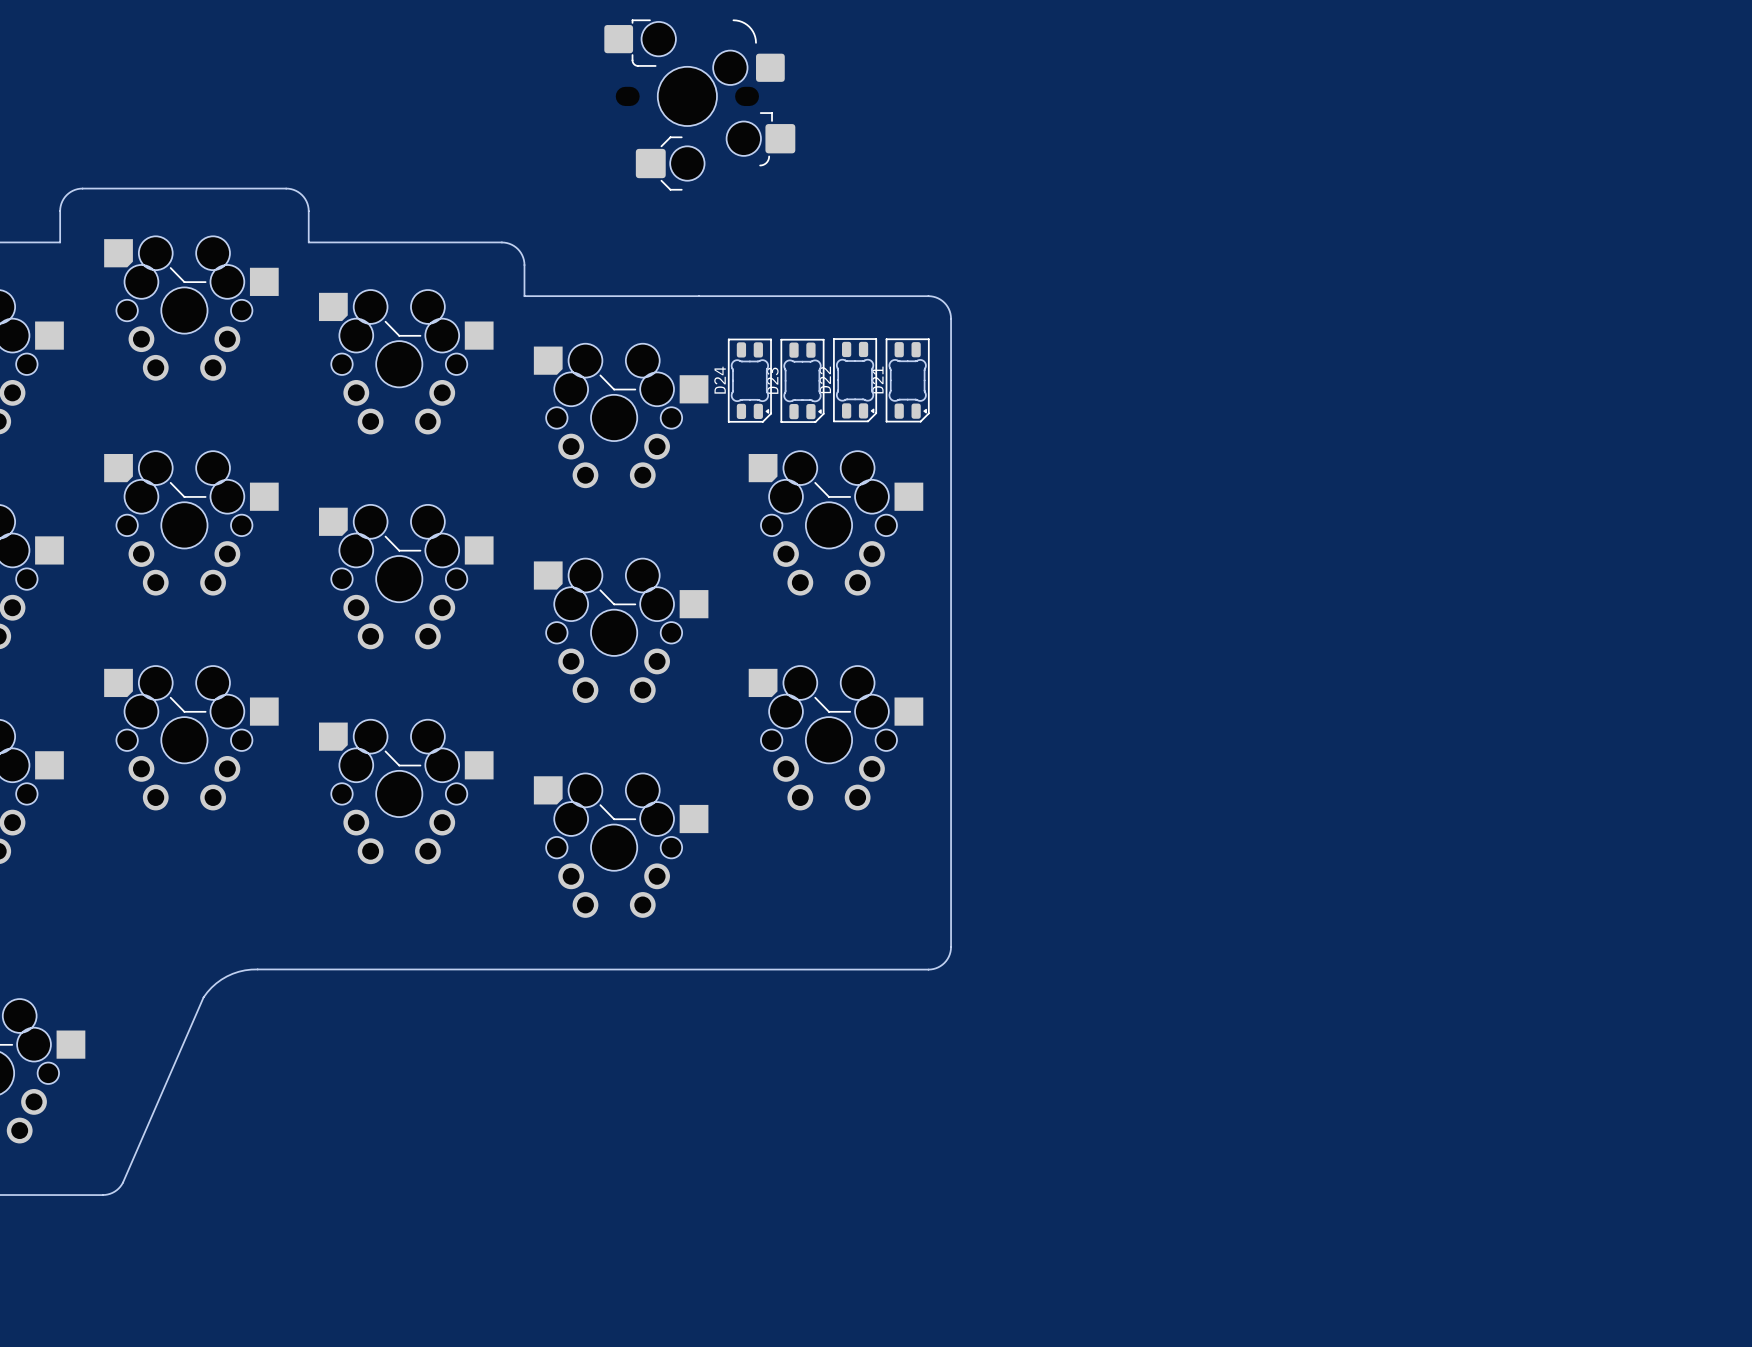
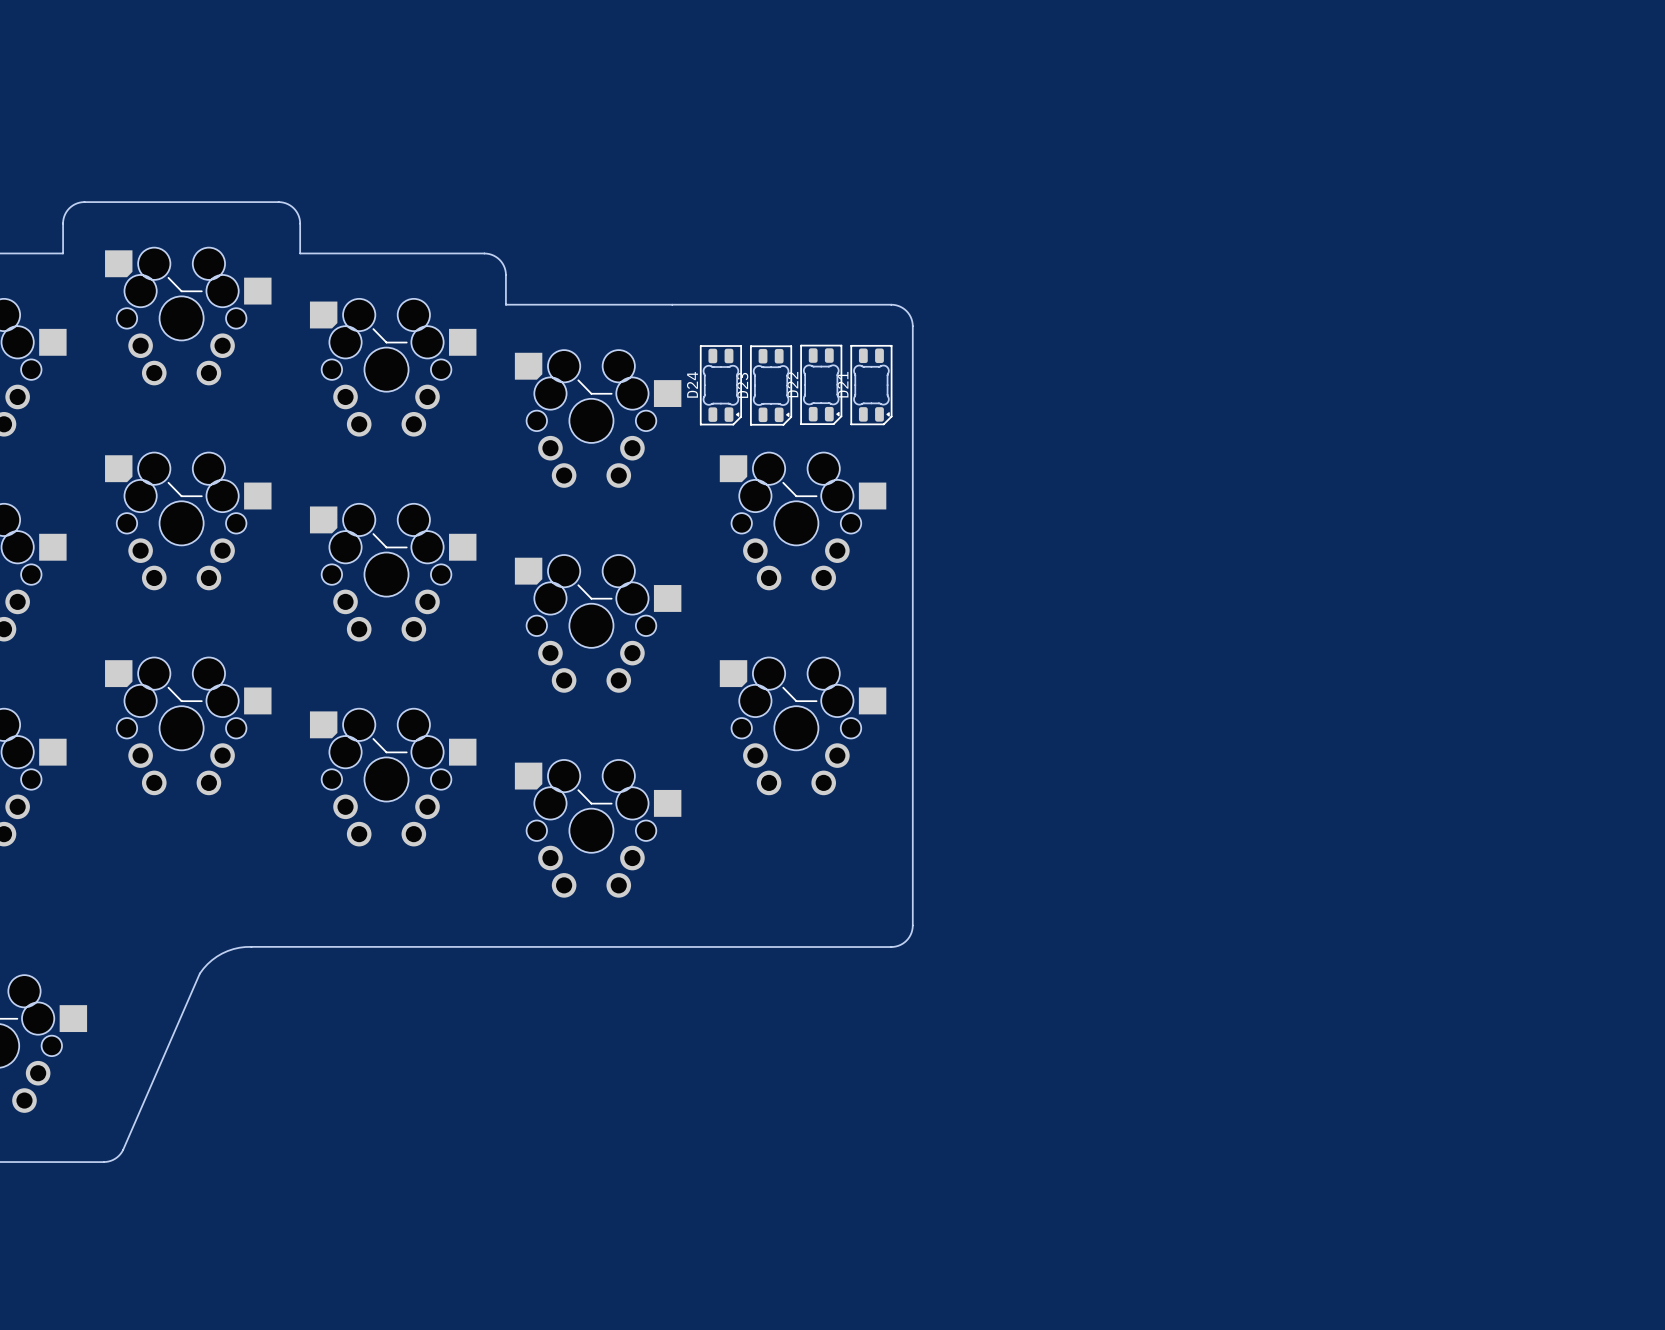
part: (699, 104) -> none

